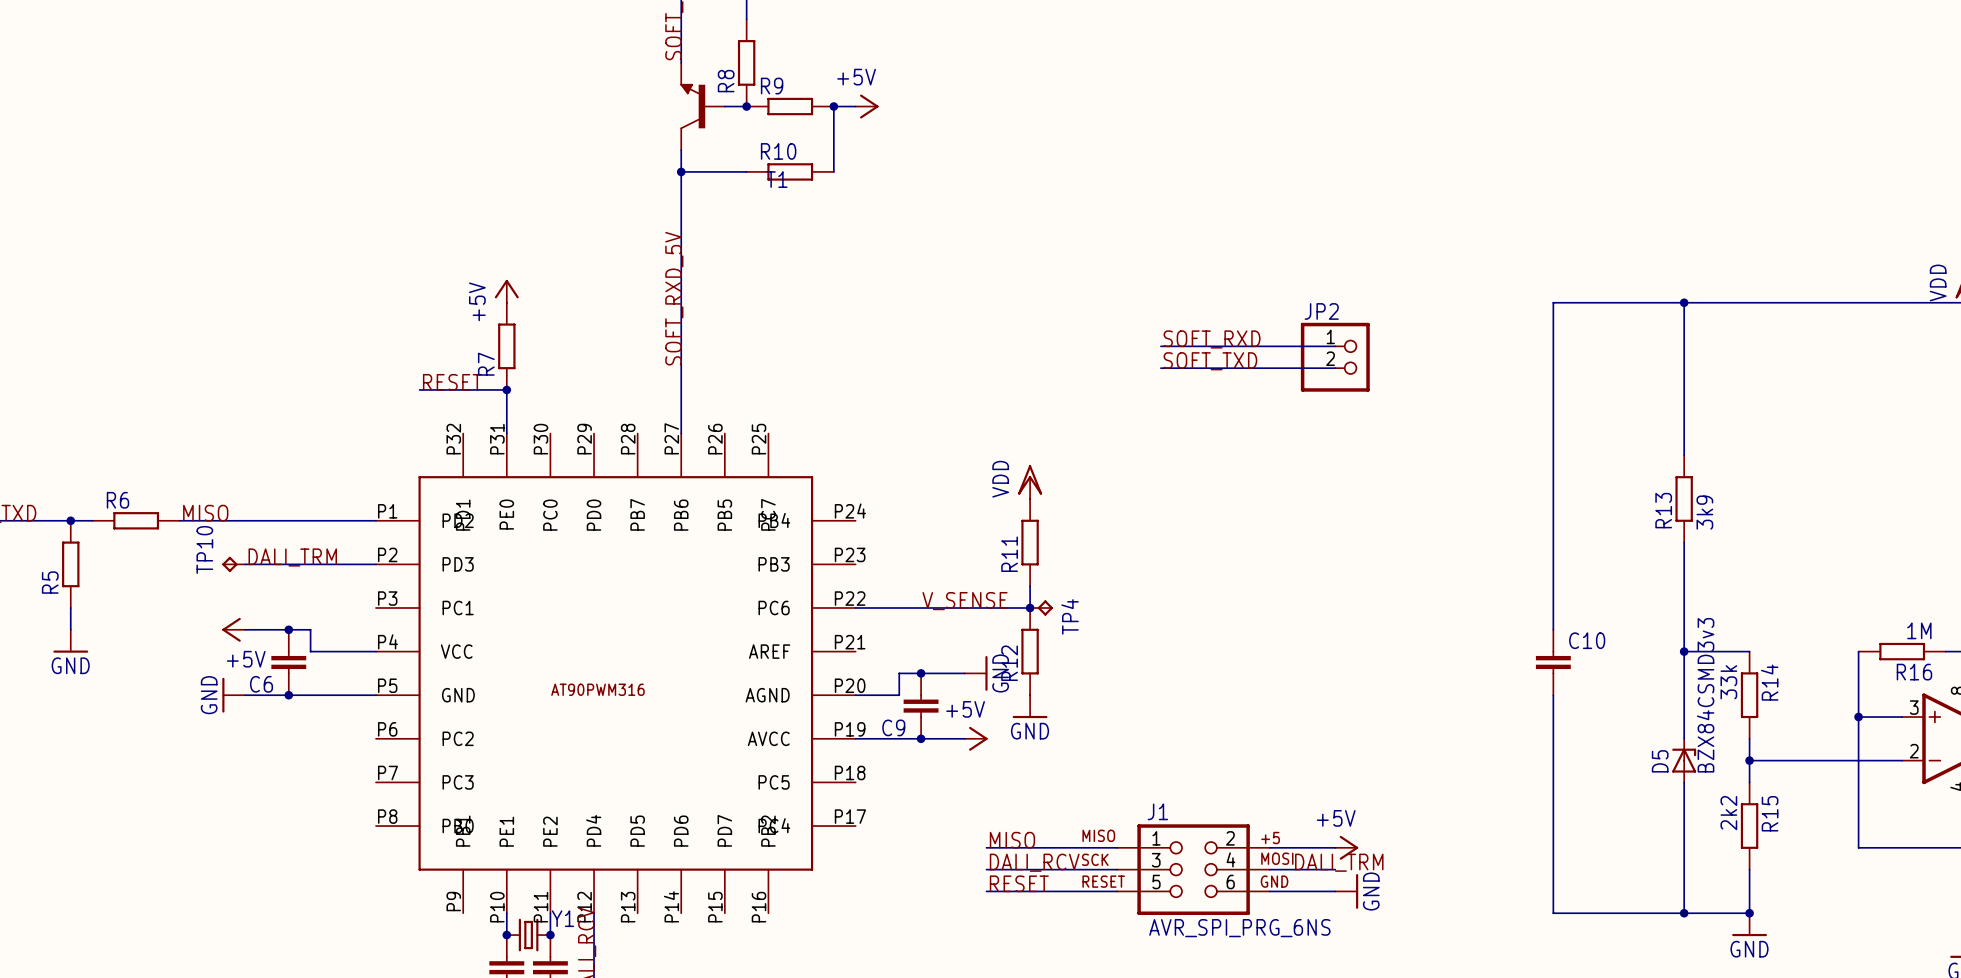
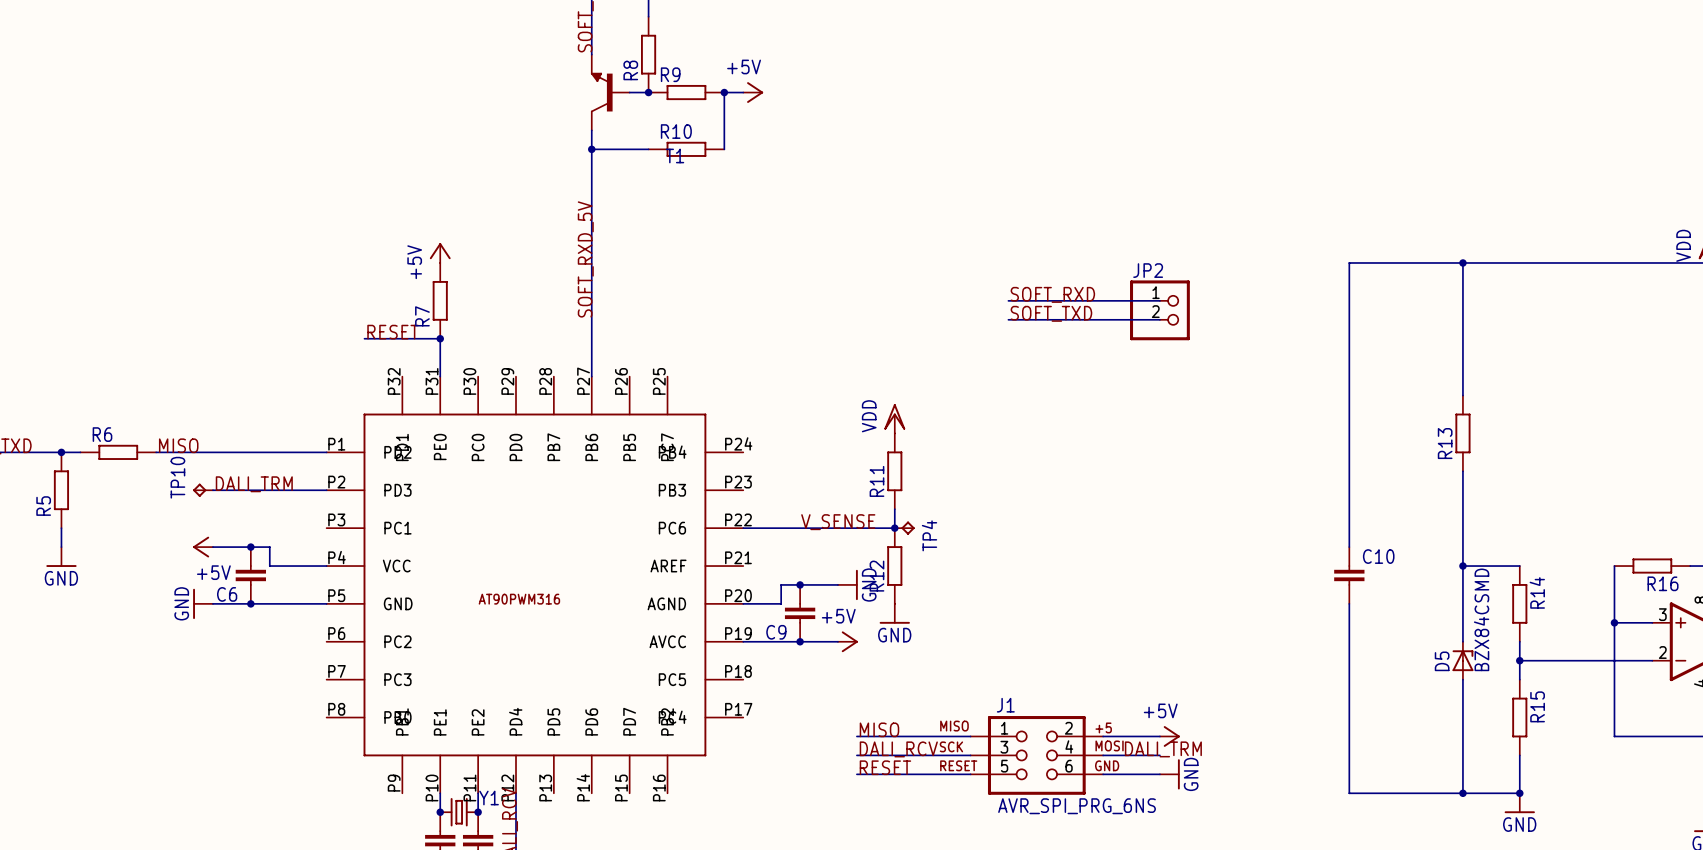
R13 value: 3k9 (1704, 512) -> none
R16 value: 1M (1919, 630) -> none
R14 value: 33k (1728, 682) -> none
D5 value: BZX84CSMD3v3 (1705, 695) -> BZX84CSMD (1481, 619)
R15 value: 2k2 (1728, 813) -> none

